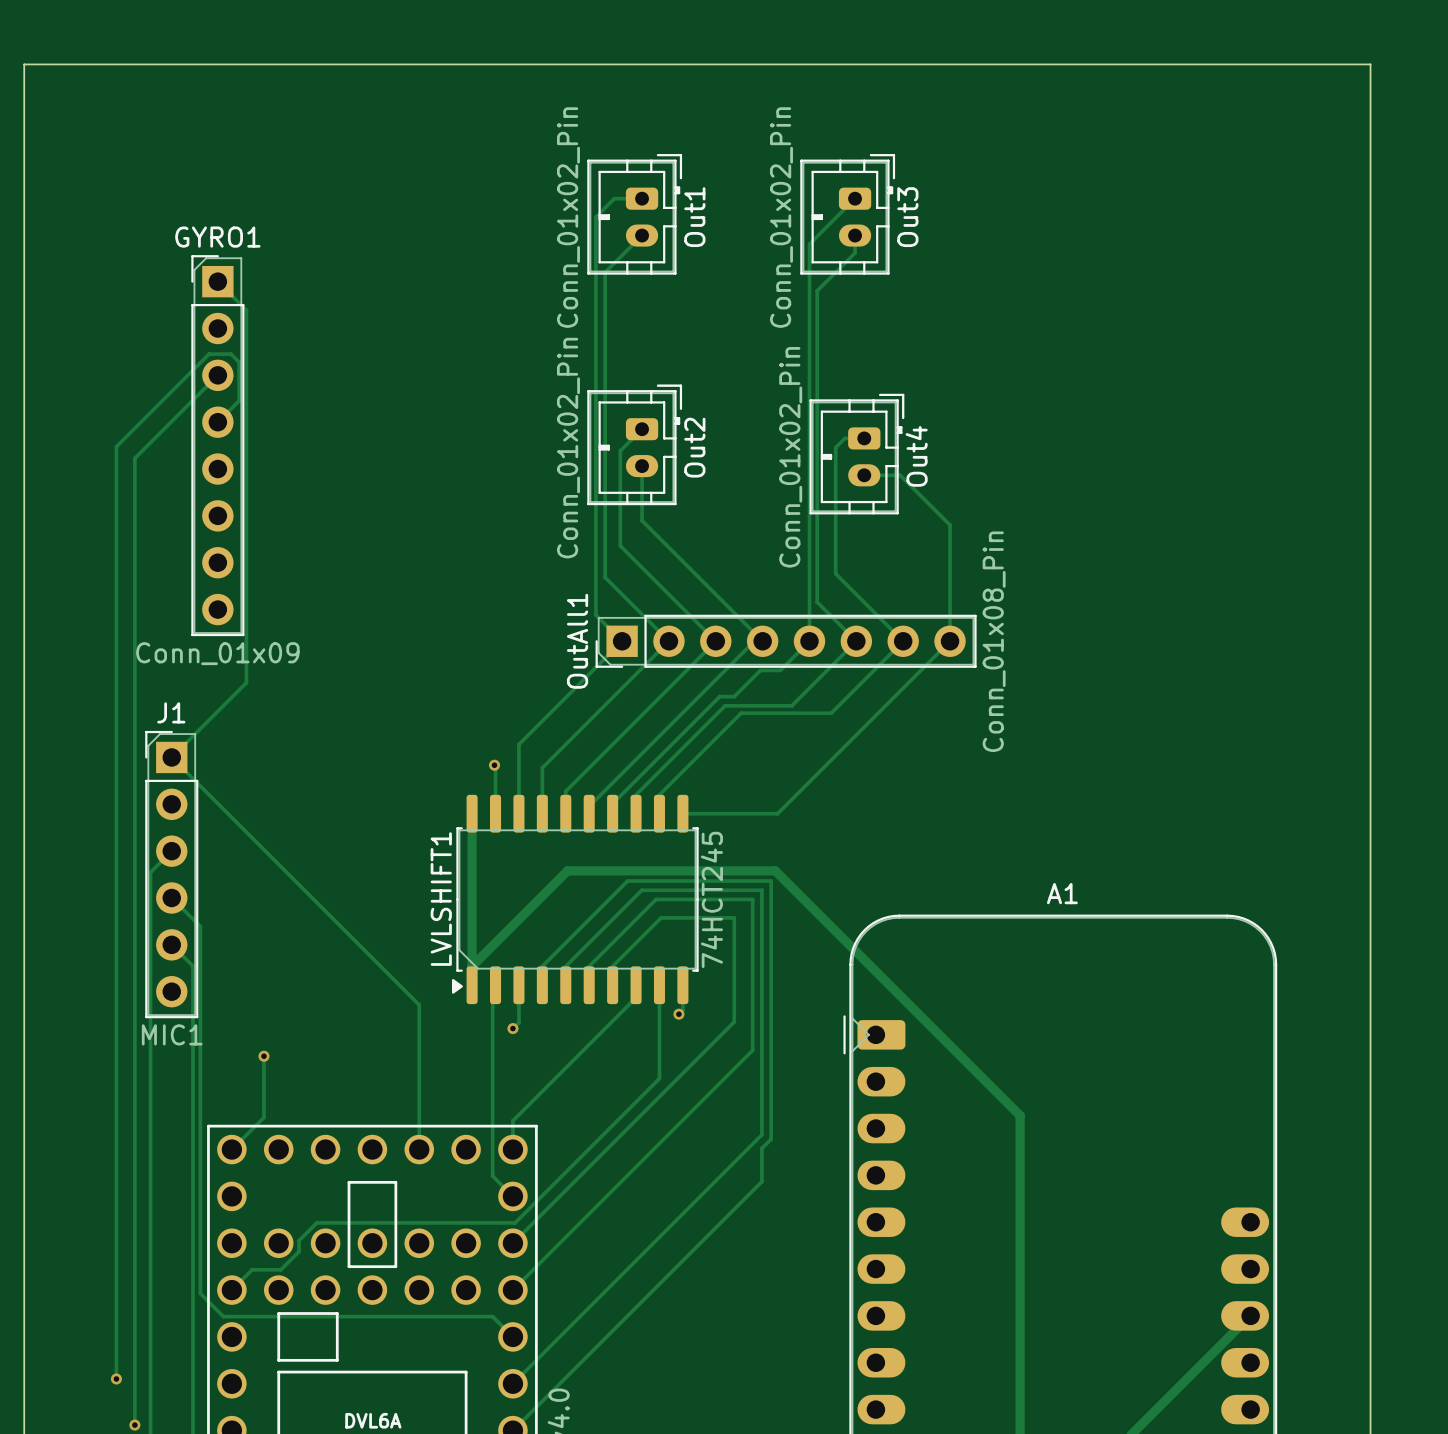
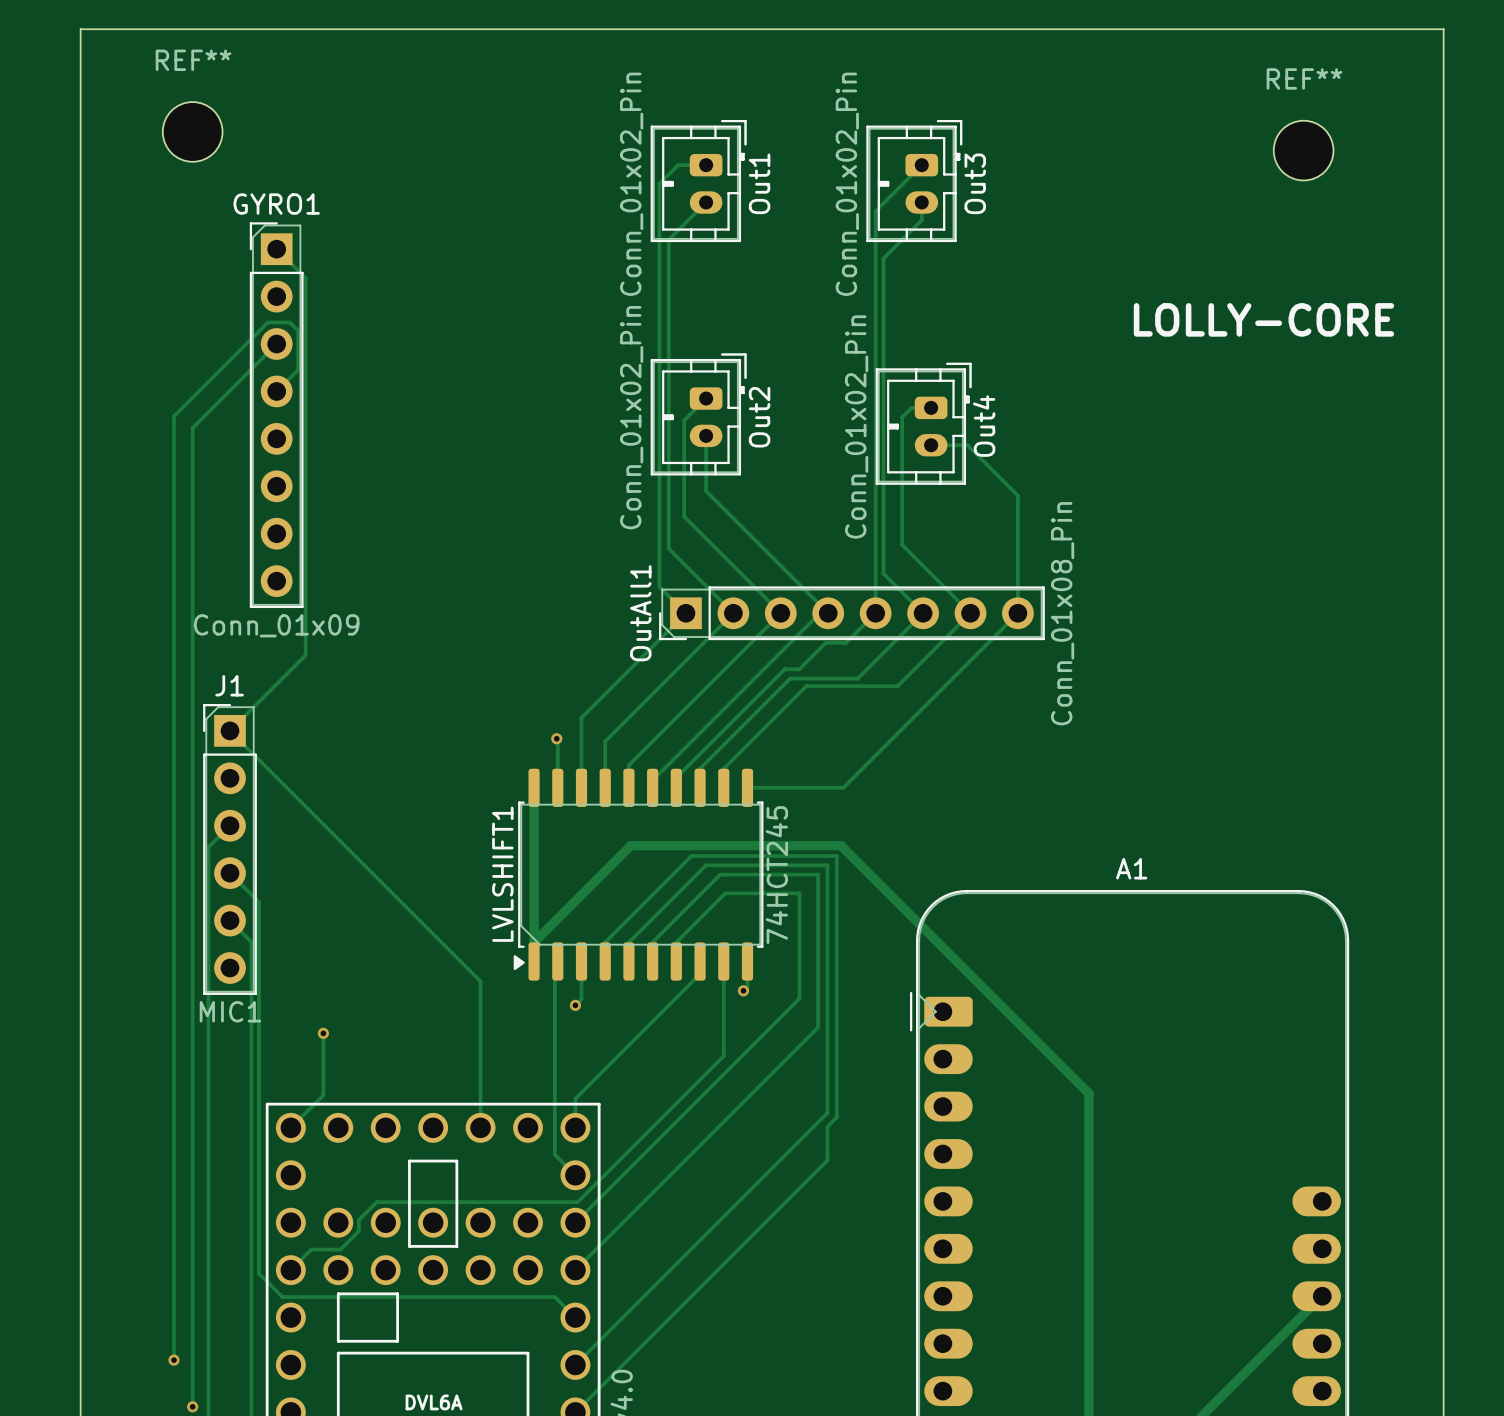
REF**: none -> (192, 131)
REF**: none -> (1303, 150)
text: none -> LOLLY-CORE (1263, 319)

